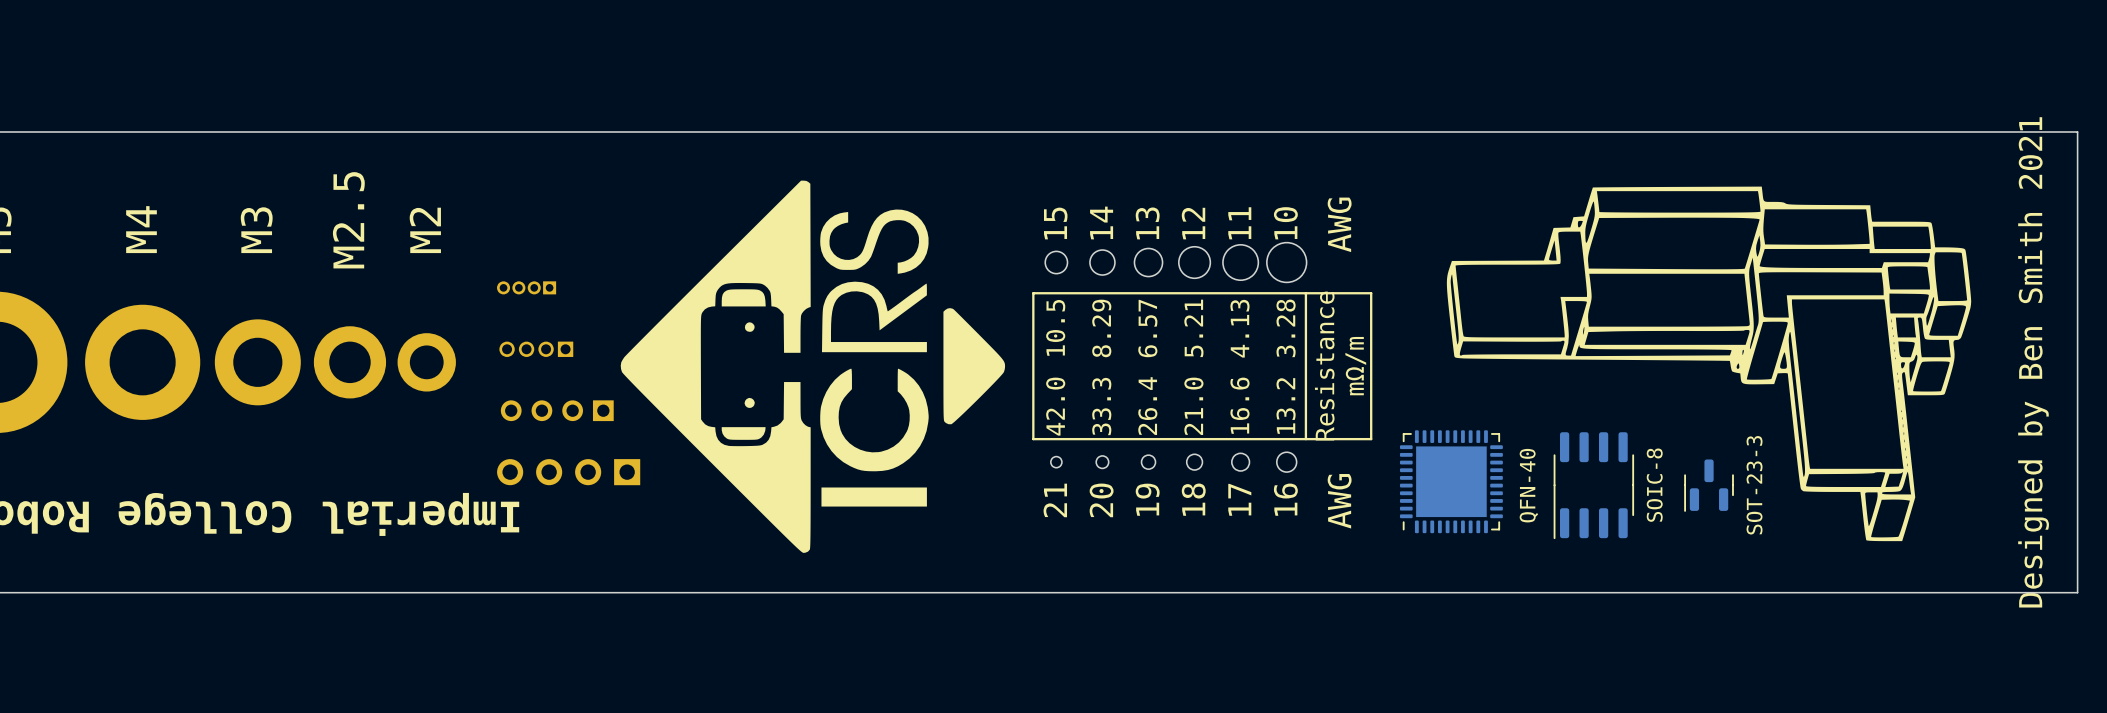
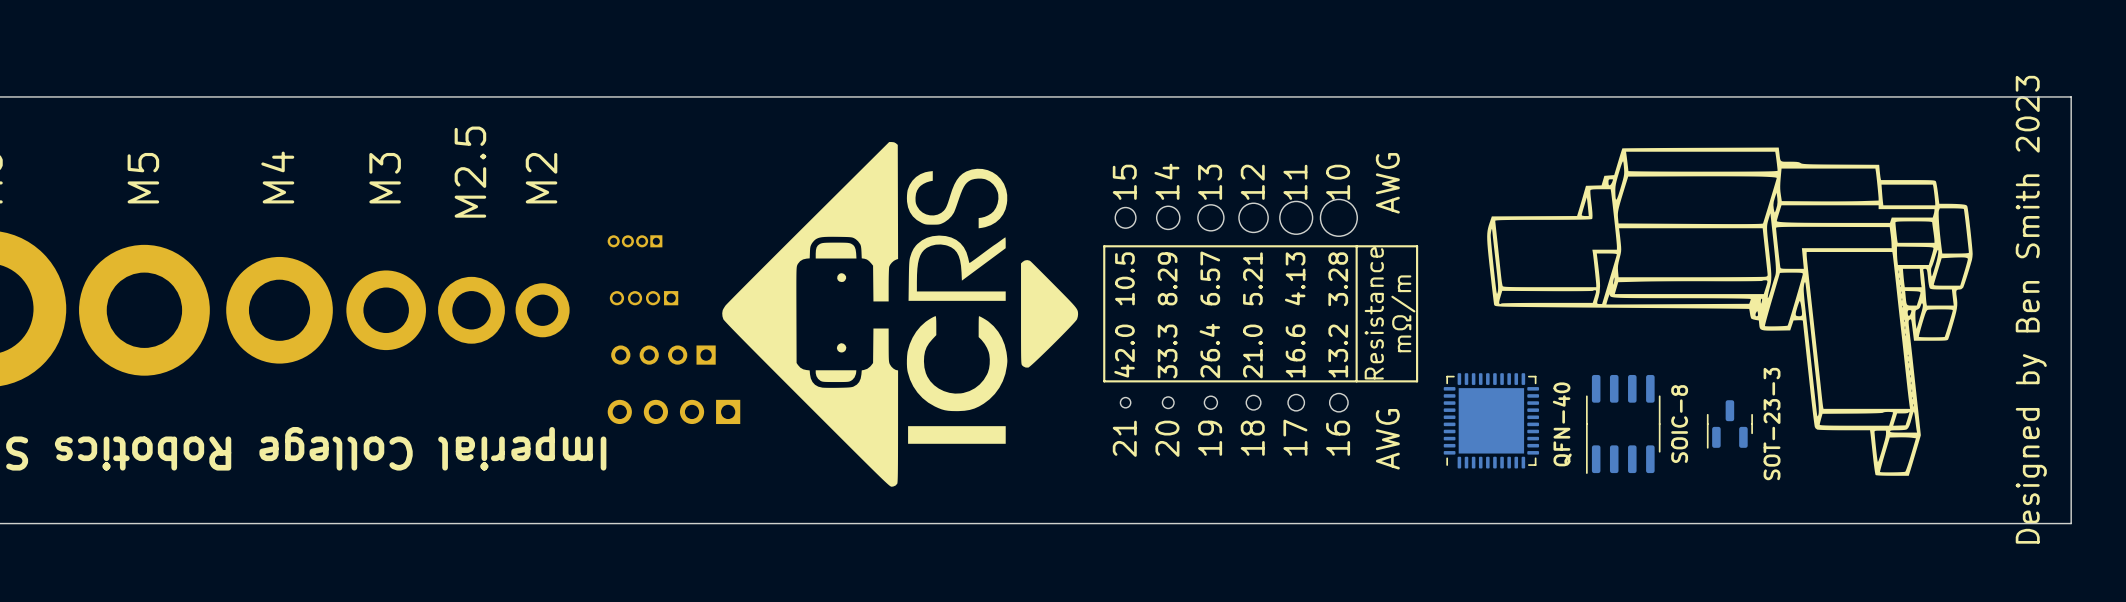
text: Designed by Ben Smith 2021 (2033, 362) -> Designed by Ben Smith 2023 (2031, 309)

